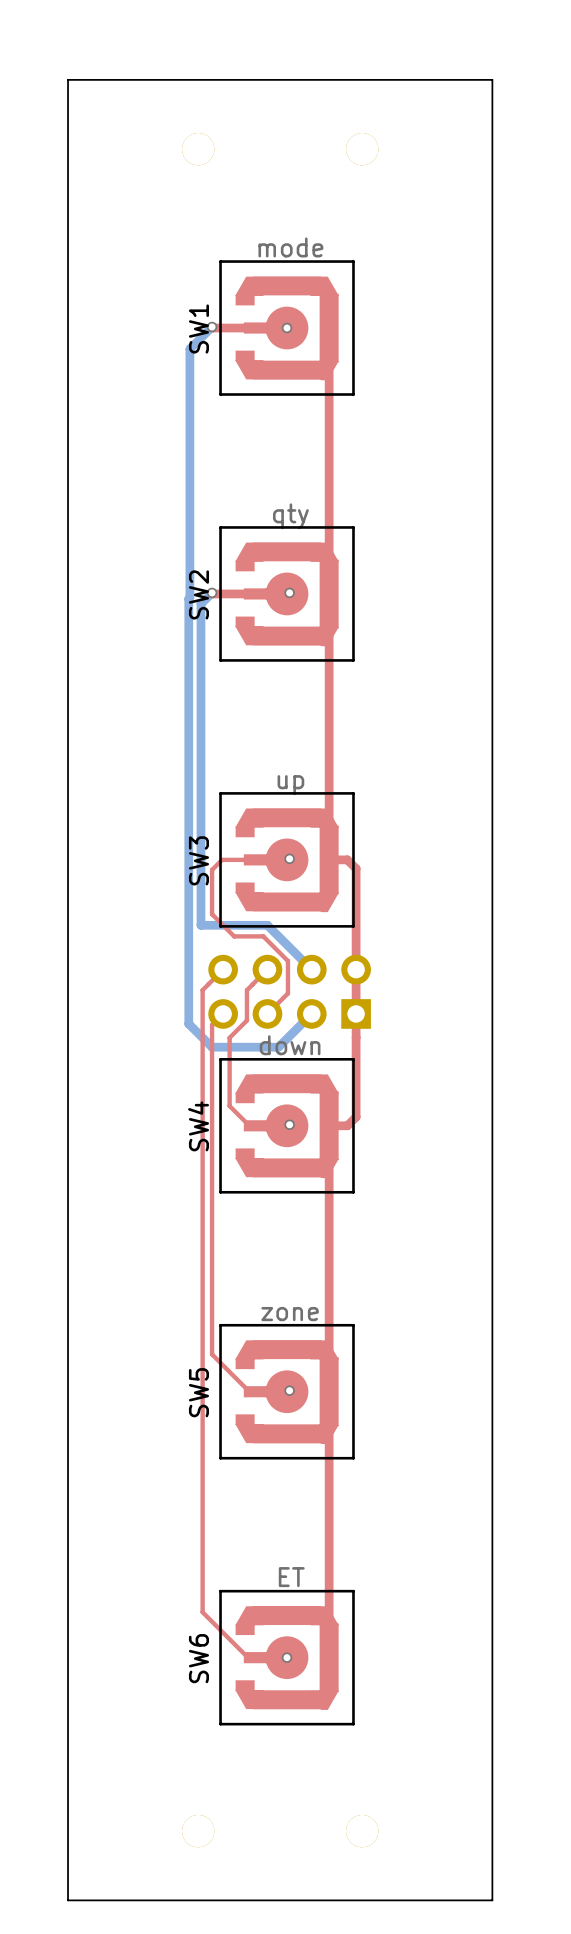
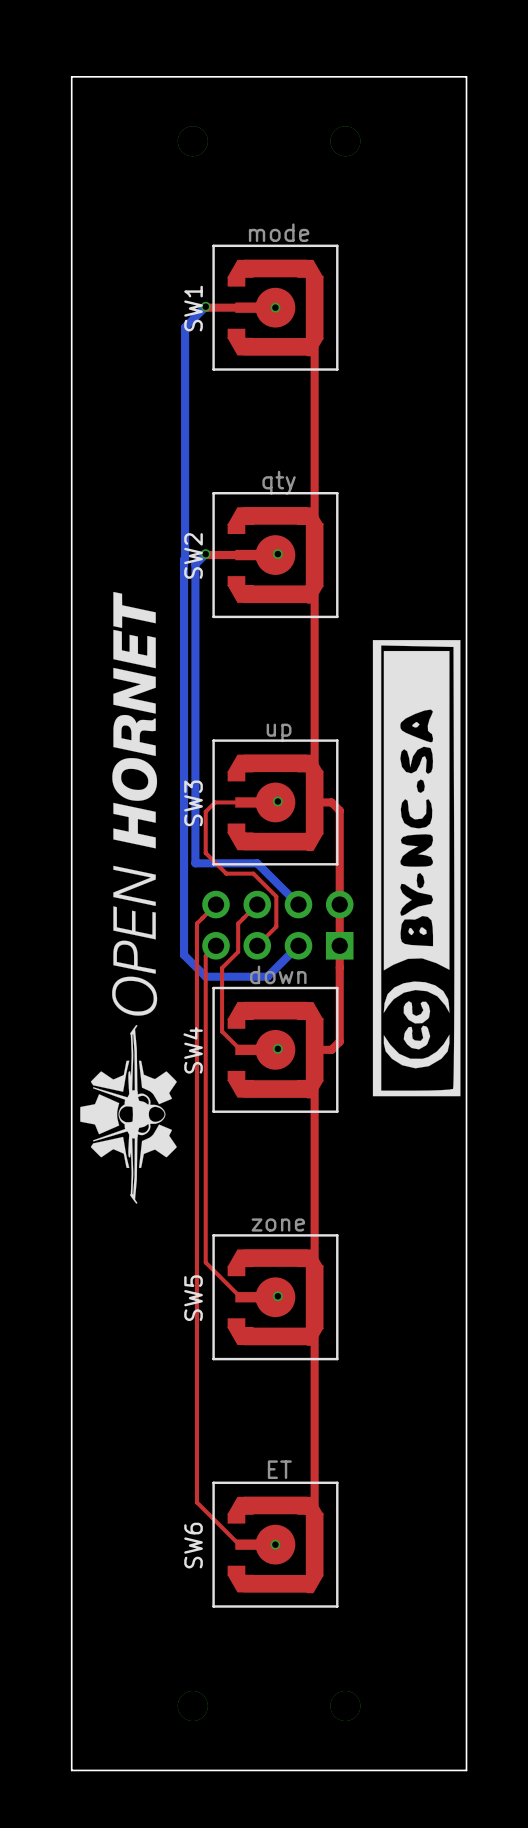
drawing: none -> [80, 591, 177, 1204]
drawing: none -> [372, 640, 461, 1097]

